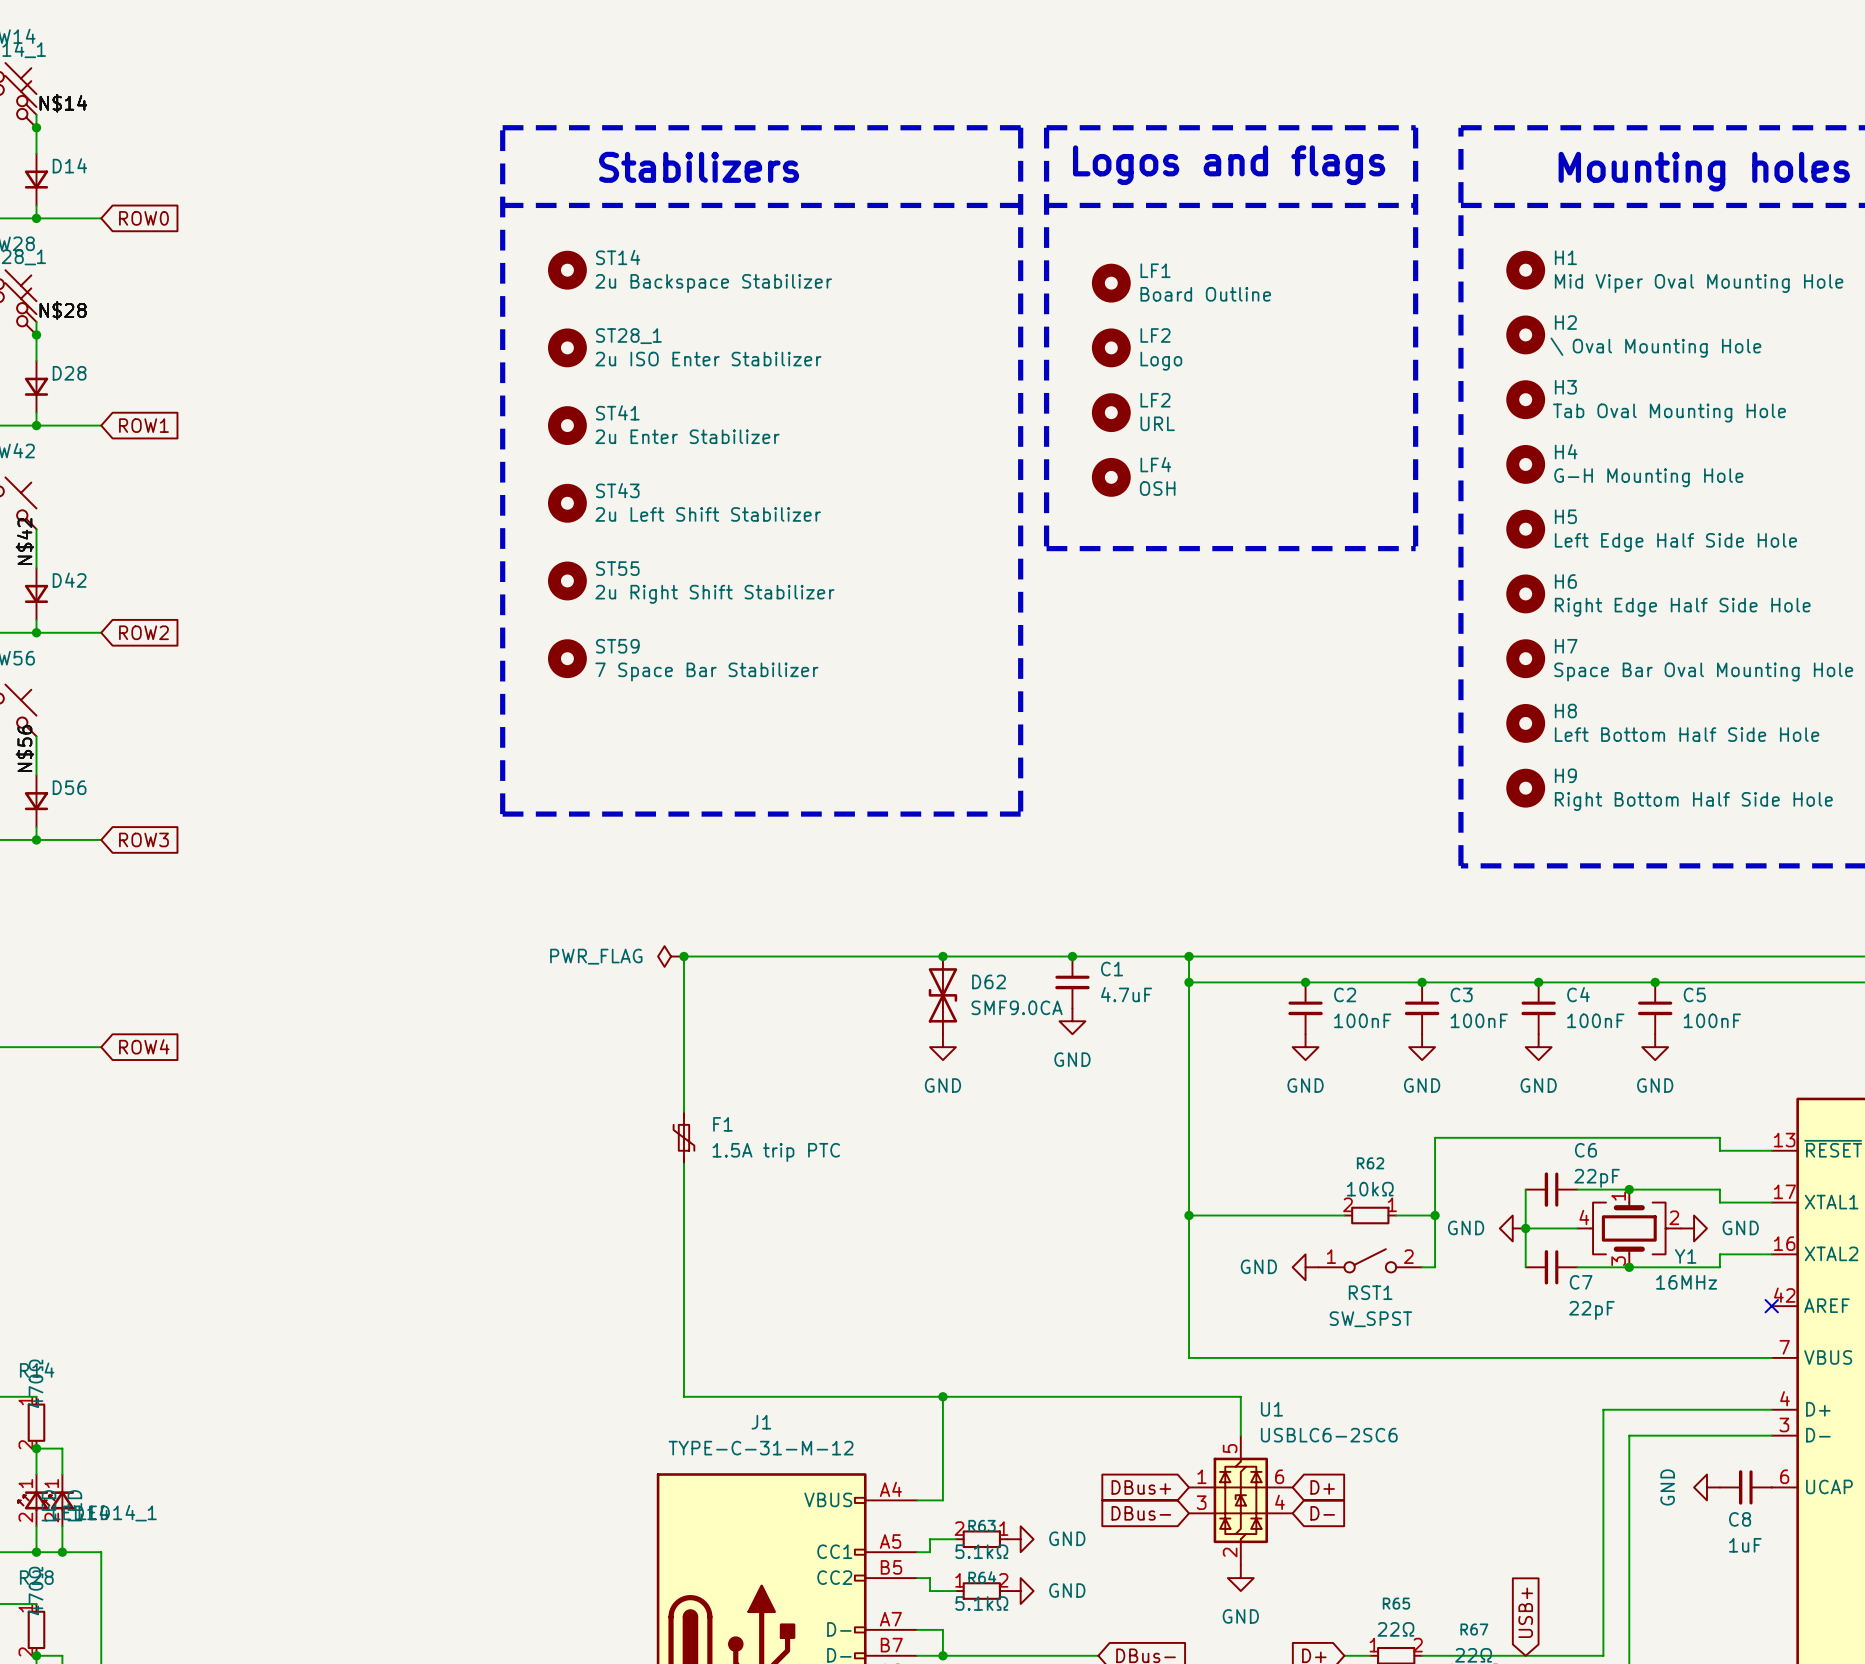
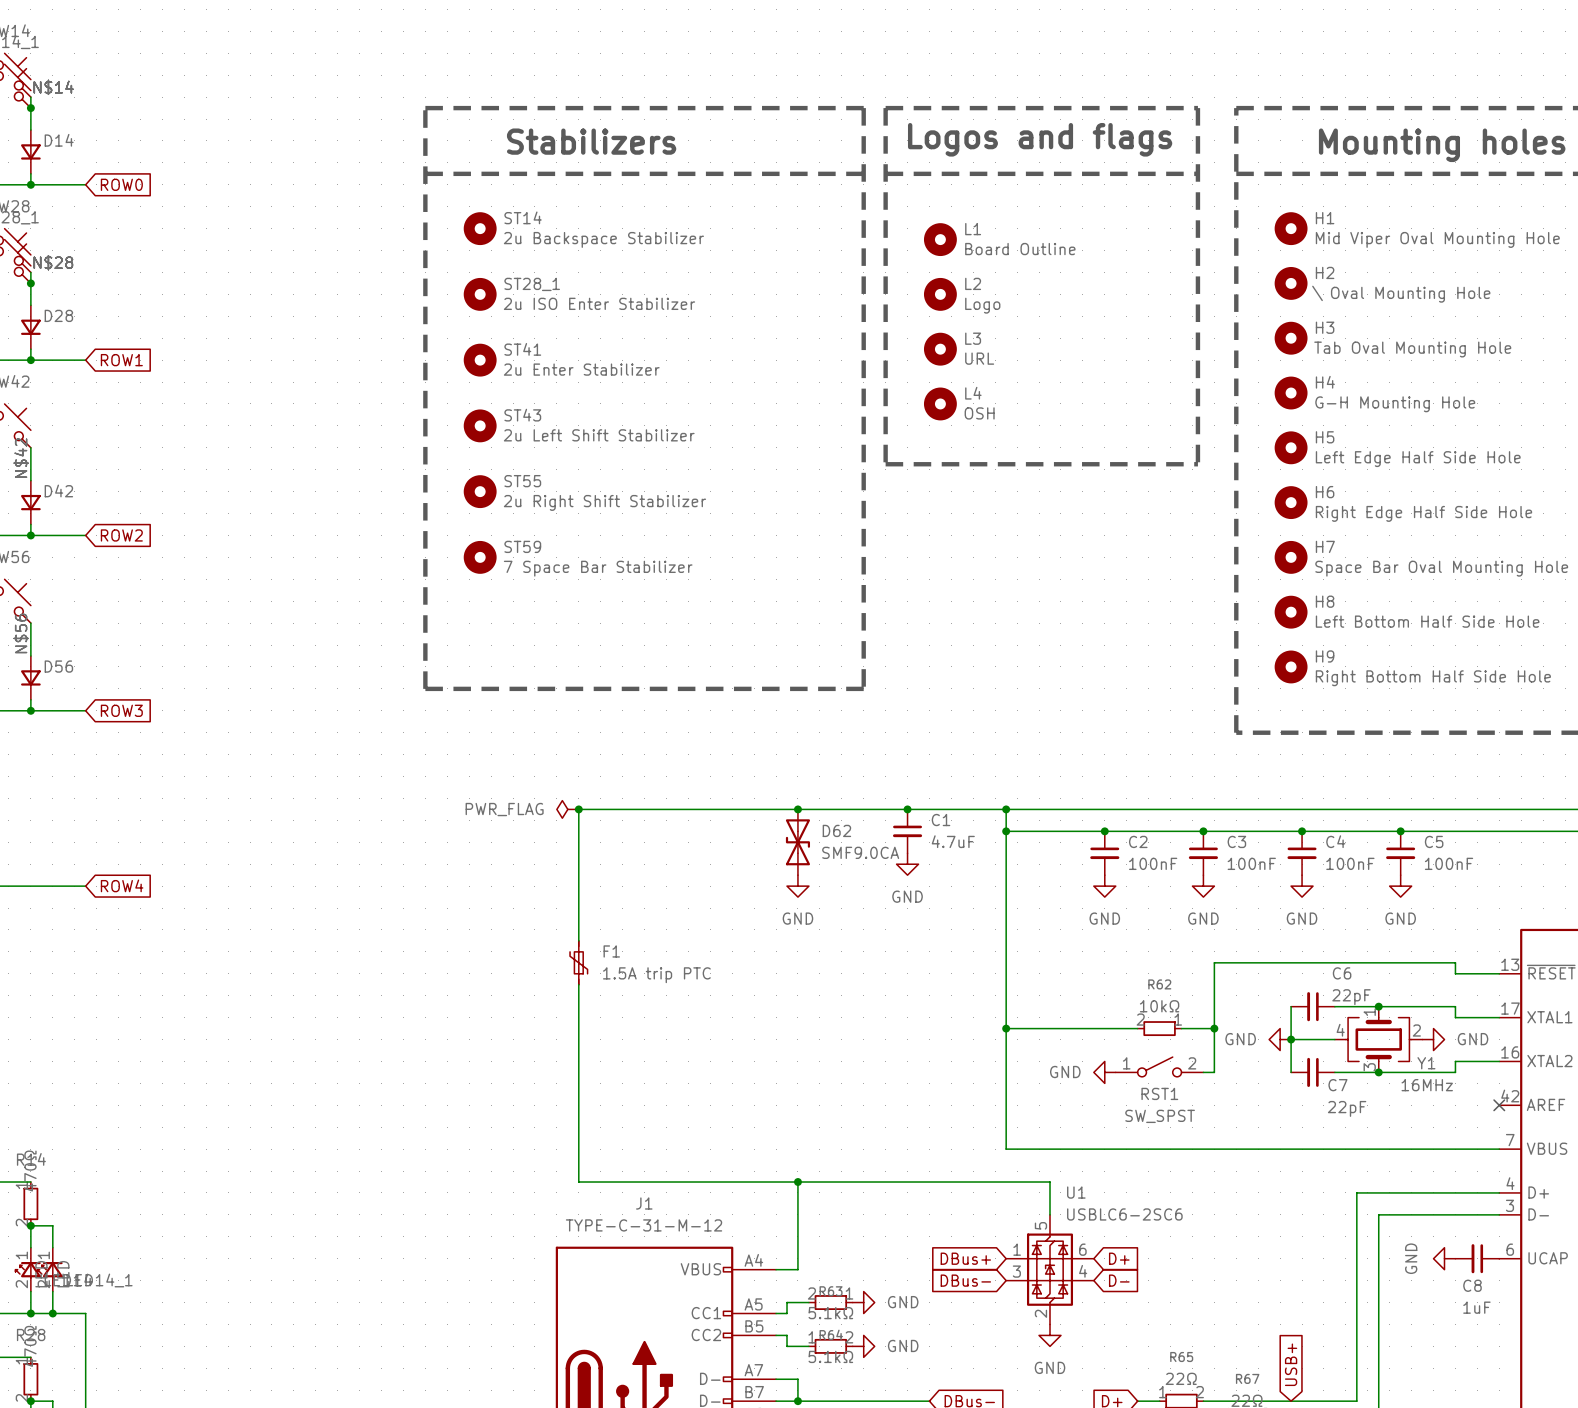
LF1 name: LF1 (1155, 270) -> L1 (973, 229)
LF2 name: LF2 (1155, 335) -> L2 (973, 283)
LF2 name: LF2 (1155, 400) -> L3 (973, 338)
LF4 name: LF4 (1155, 464) -> L4 (973, 393)

